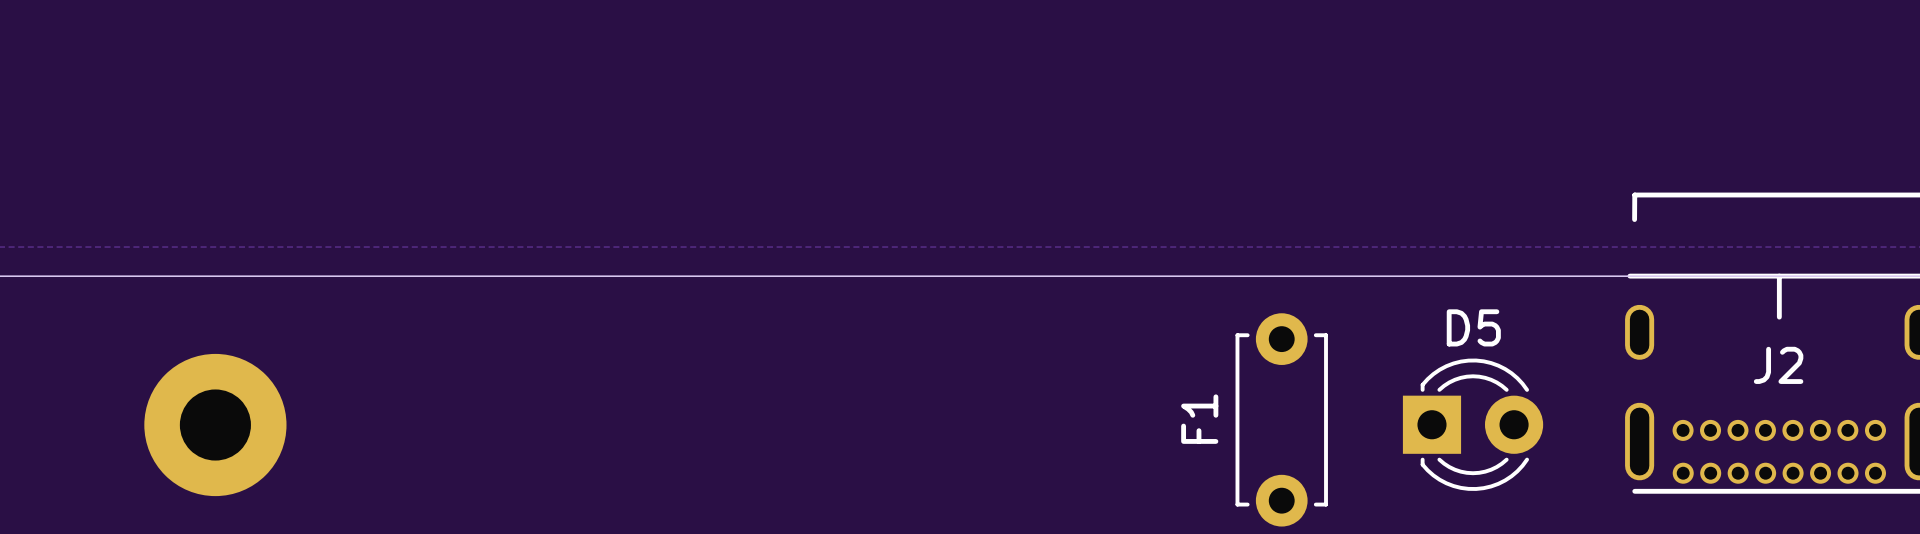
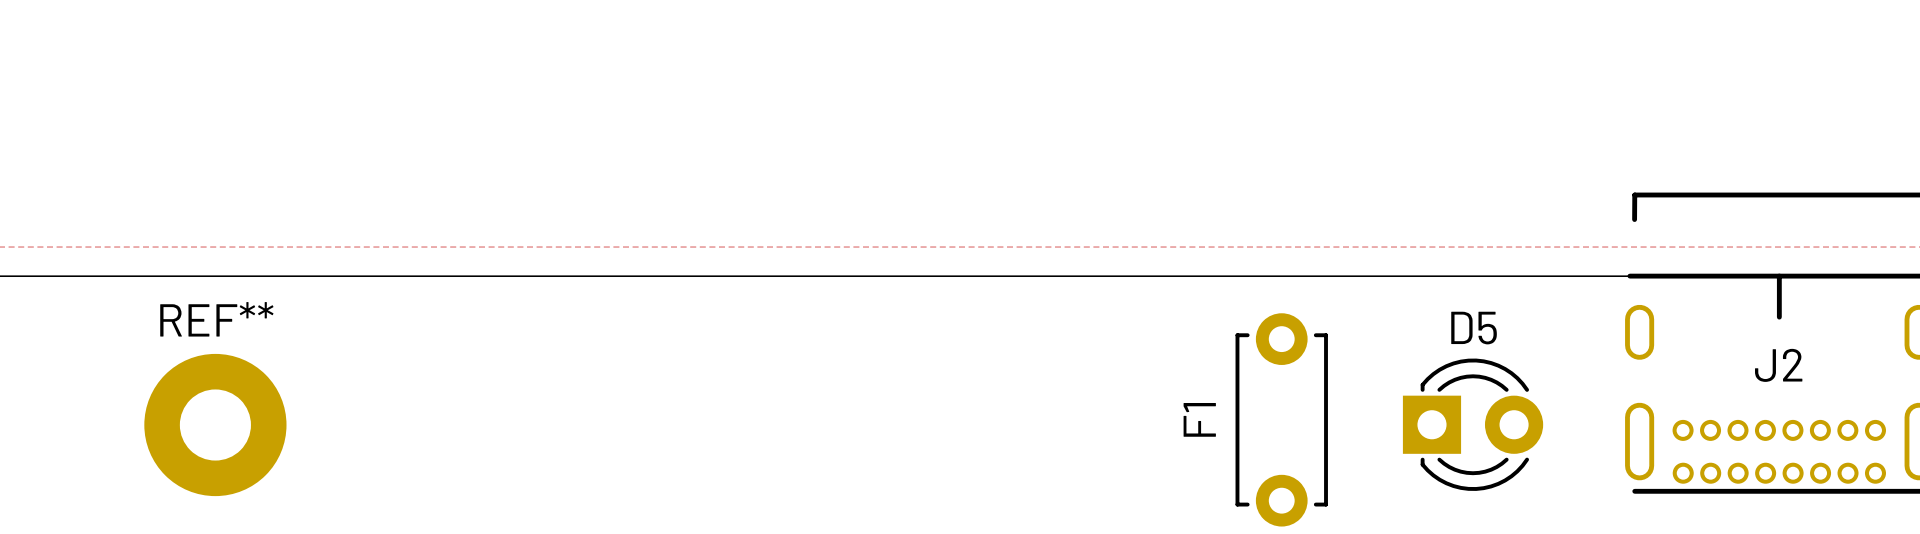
REF** name: none -> REF** (216, 319)

